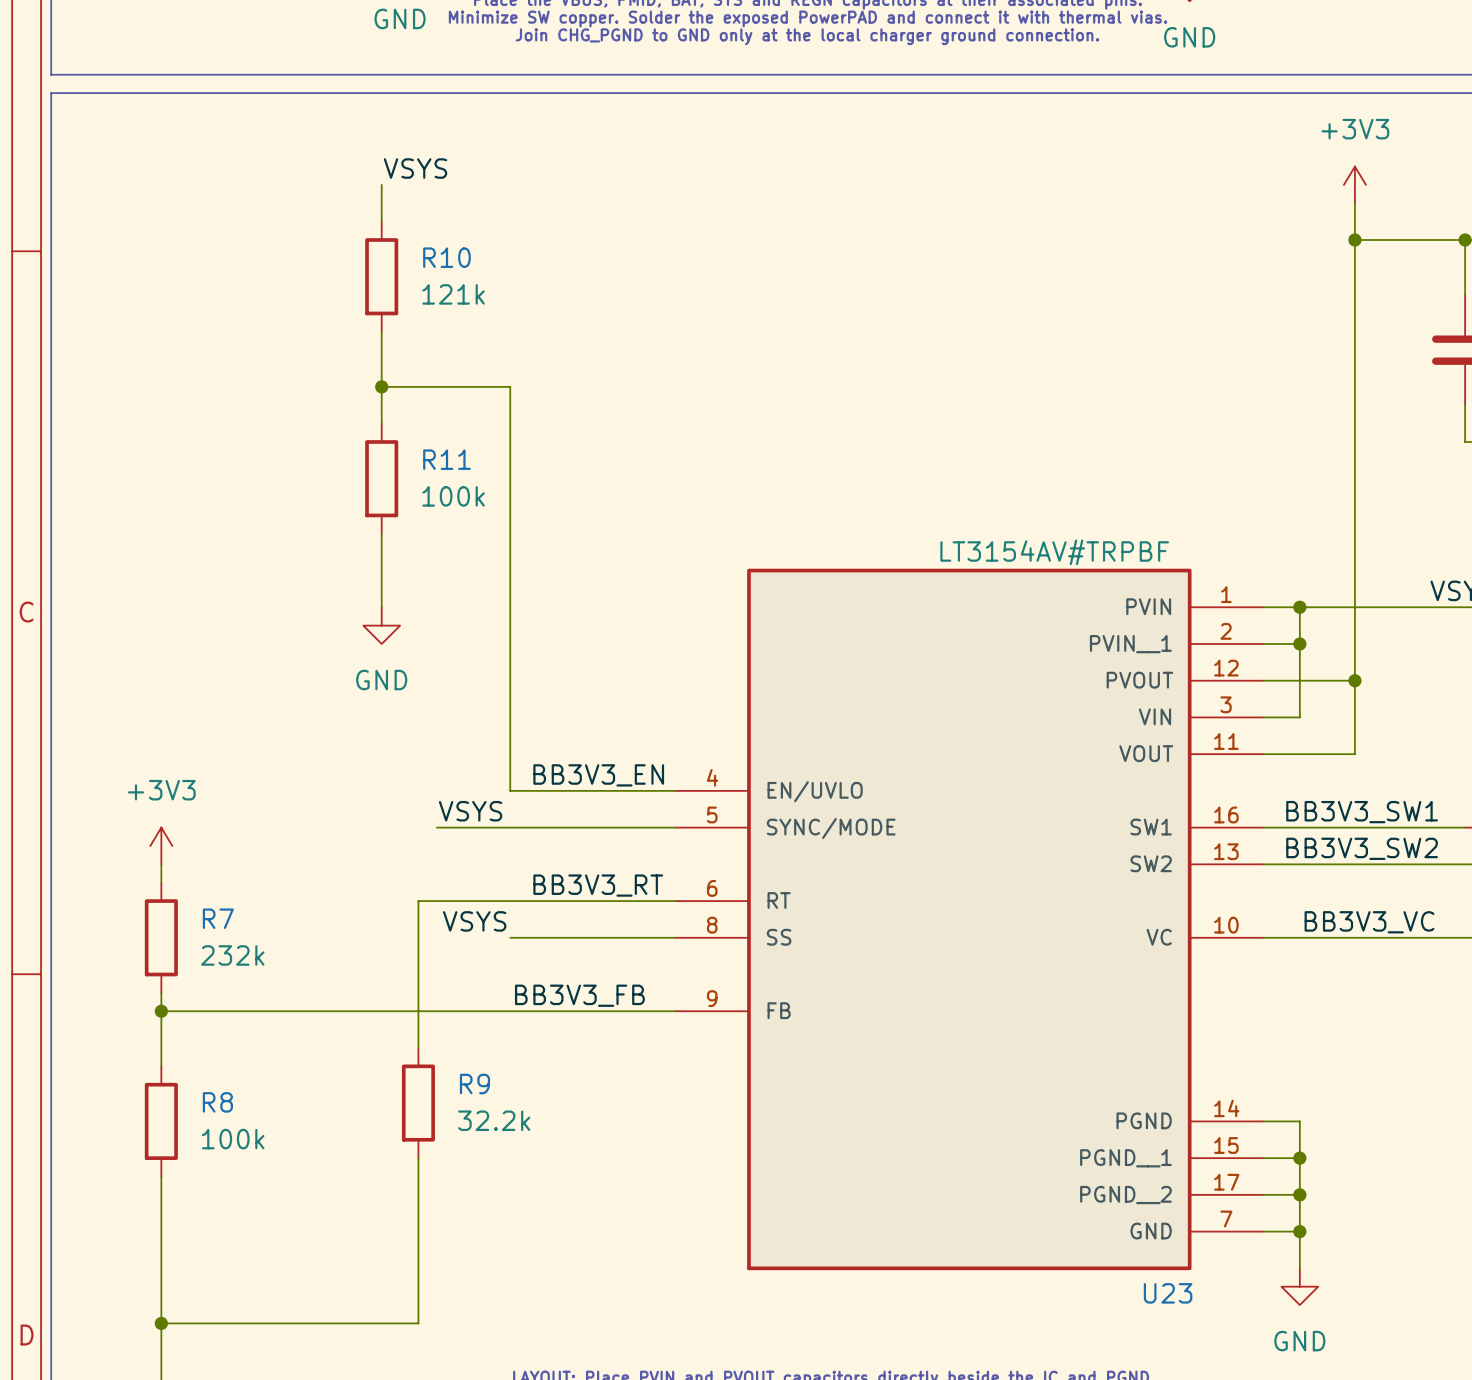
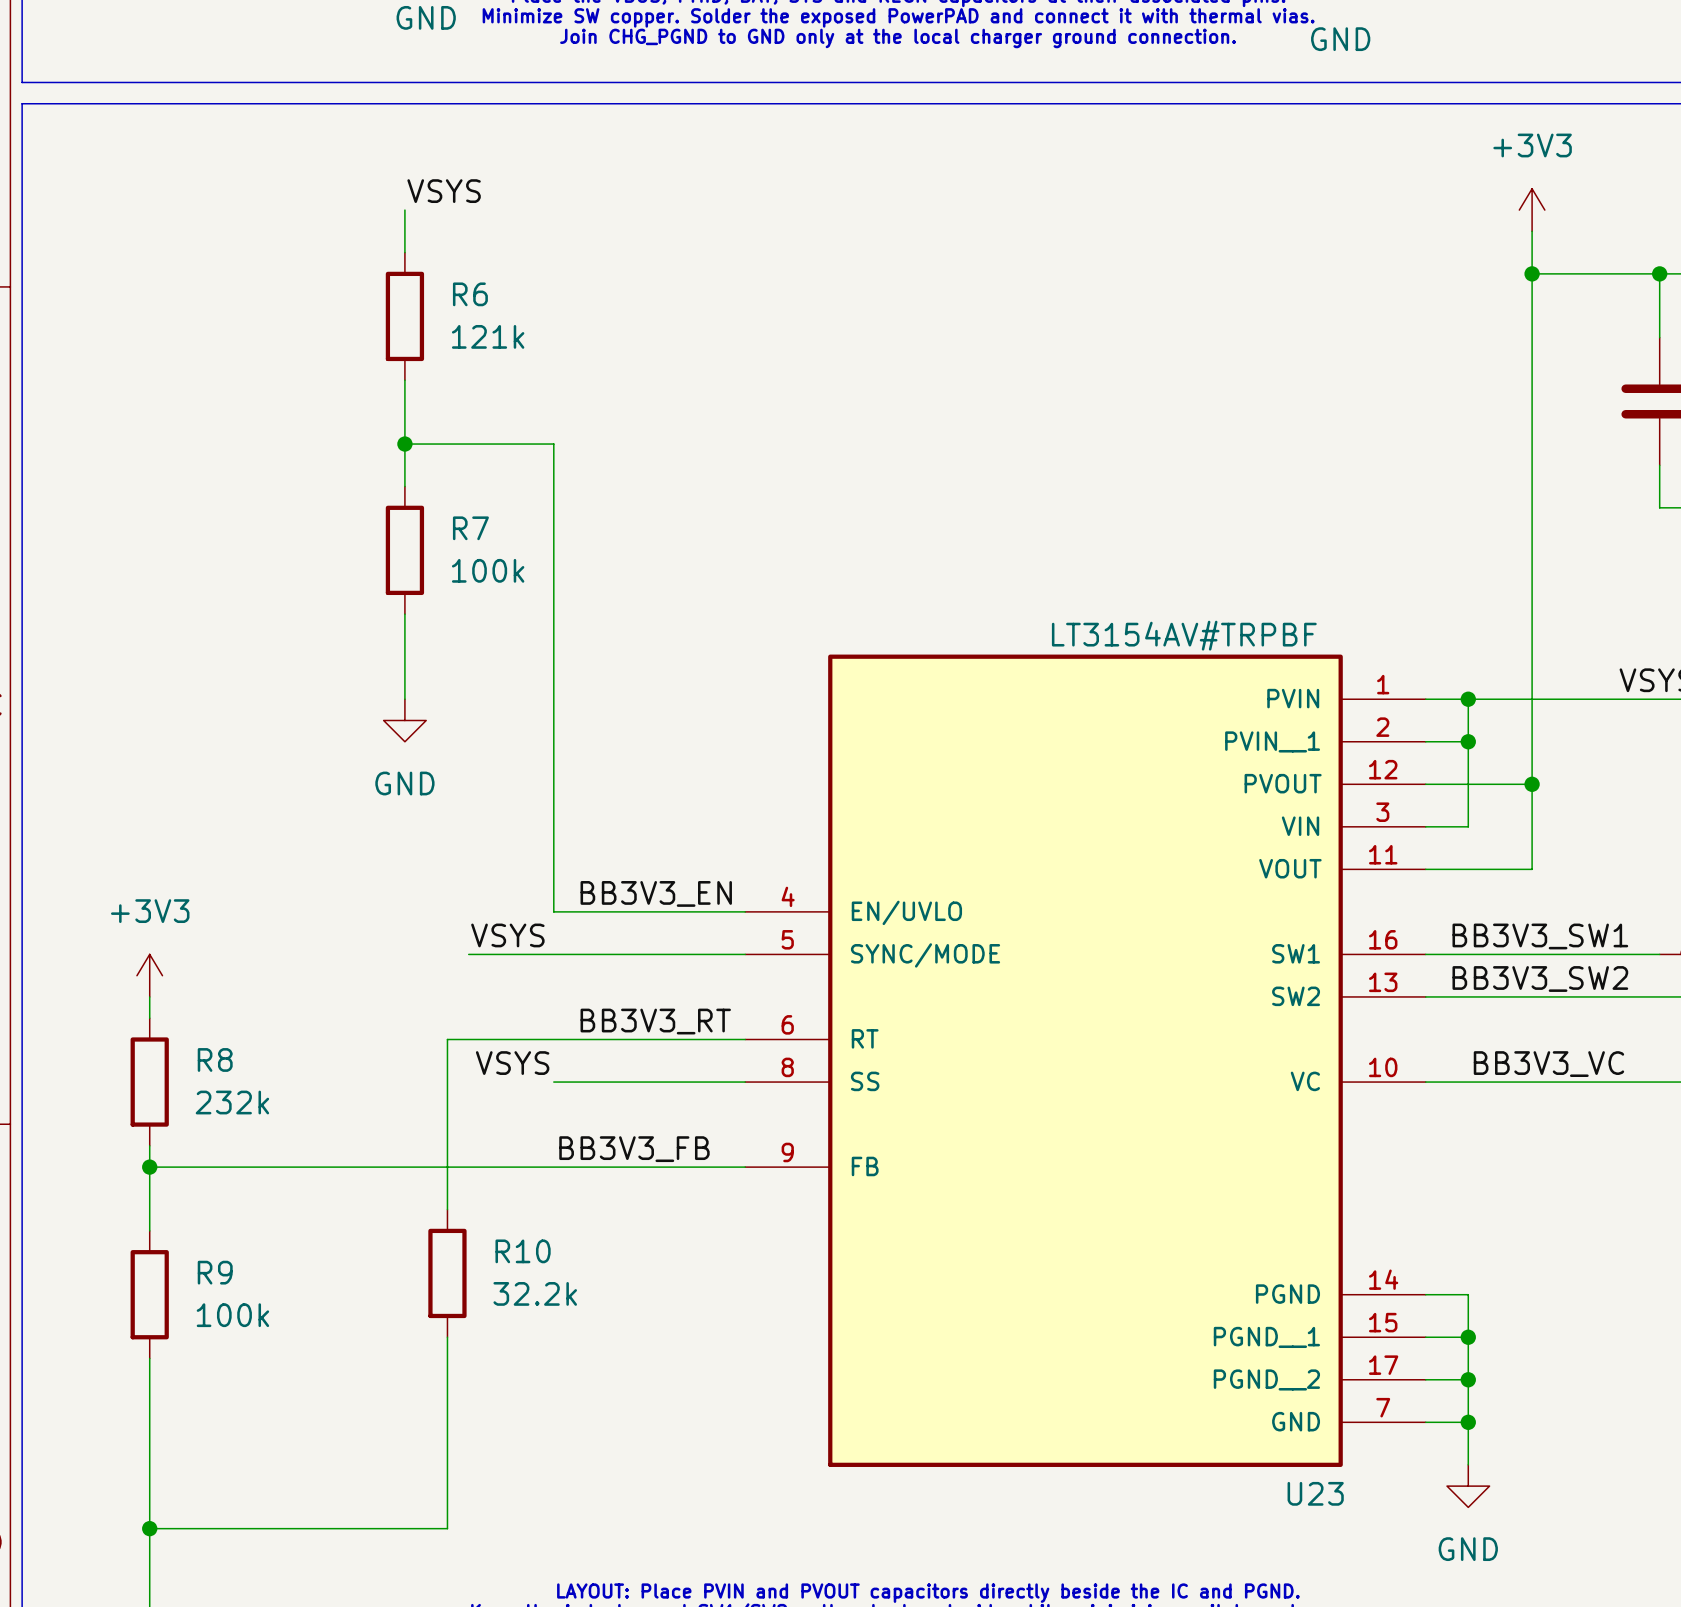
R10 name: R10 (446, 257) -> R6 (470, 294)
R11 name: R11 (446, 459) -> R7 (470, 528)
R7 name: R7 (218, 918) -> R8 (215, 1059)
R9 name: R9 (474, 1084) -> R10 (523, 1251)
R8 name: R8 (217, 1102) -> R9 (215, 1272)

